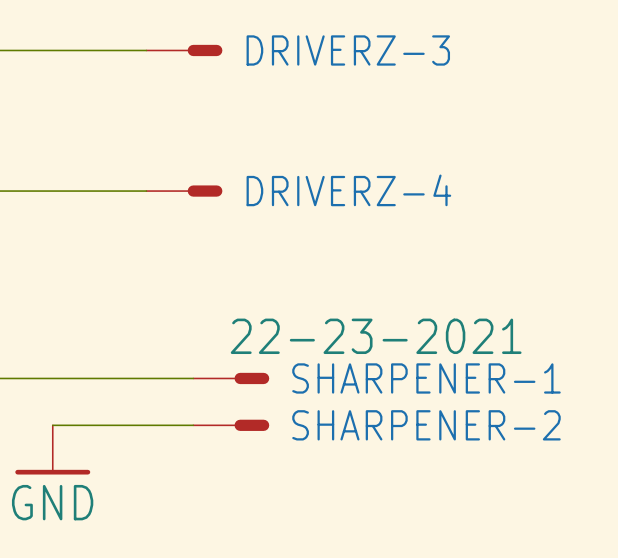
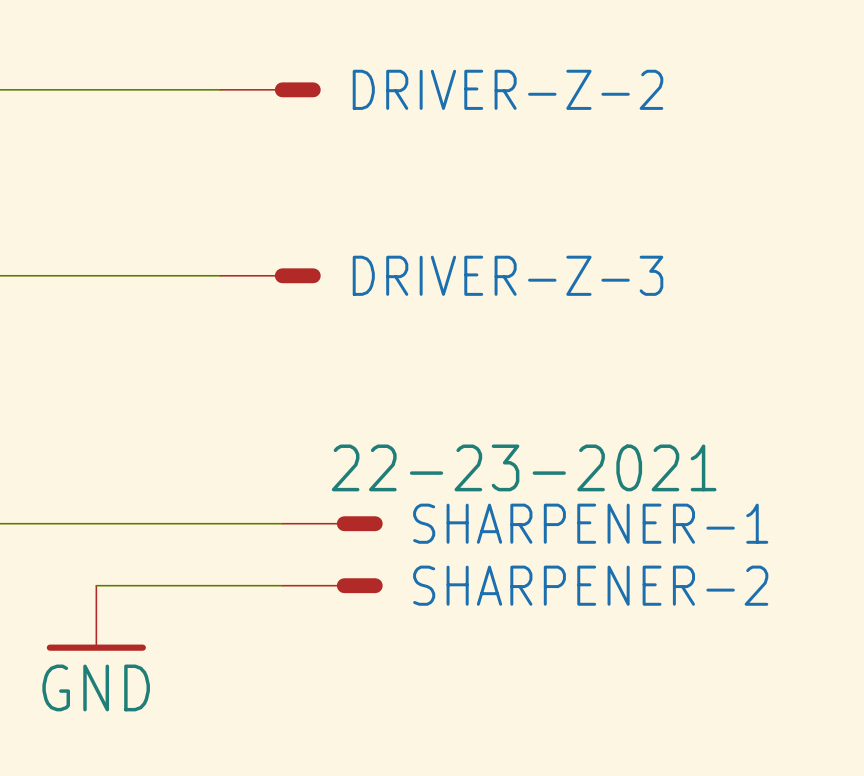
DRIVERZ-3 name: DRIVERZ-3 (348, 50) -> DRIVER-Z-2 (508, 89)
DRIVERZ-4 name: DRIVERZ-4 (348, 190) -> DRIVER-Z-3 (508, 275)

